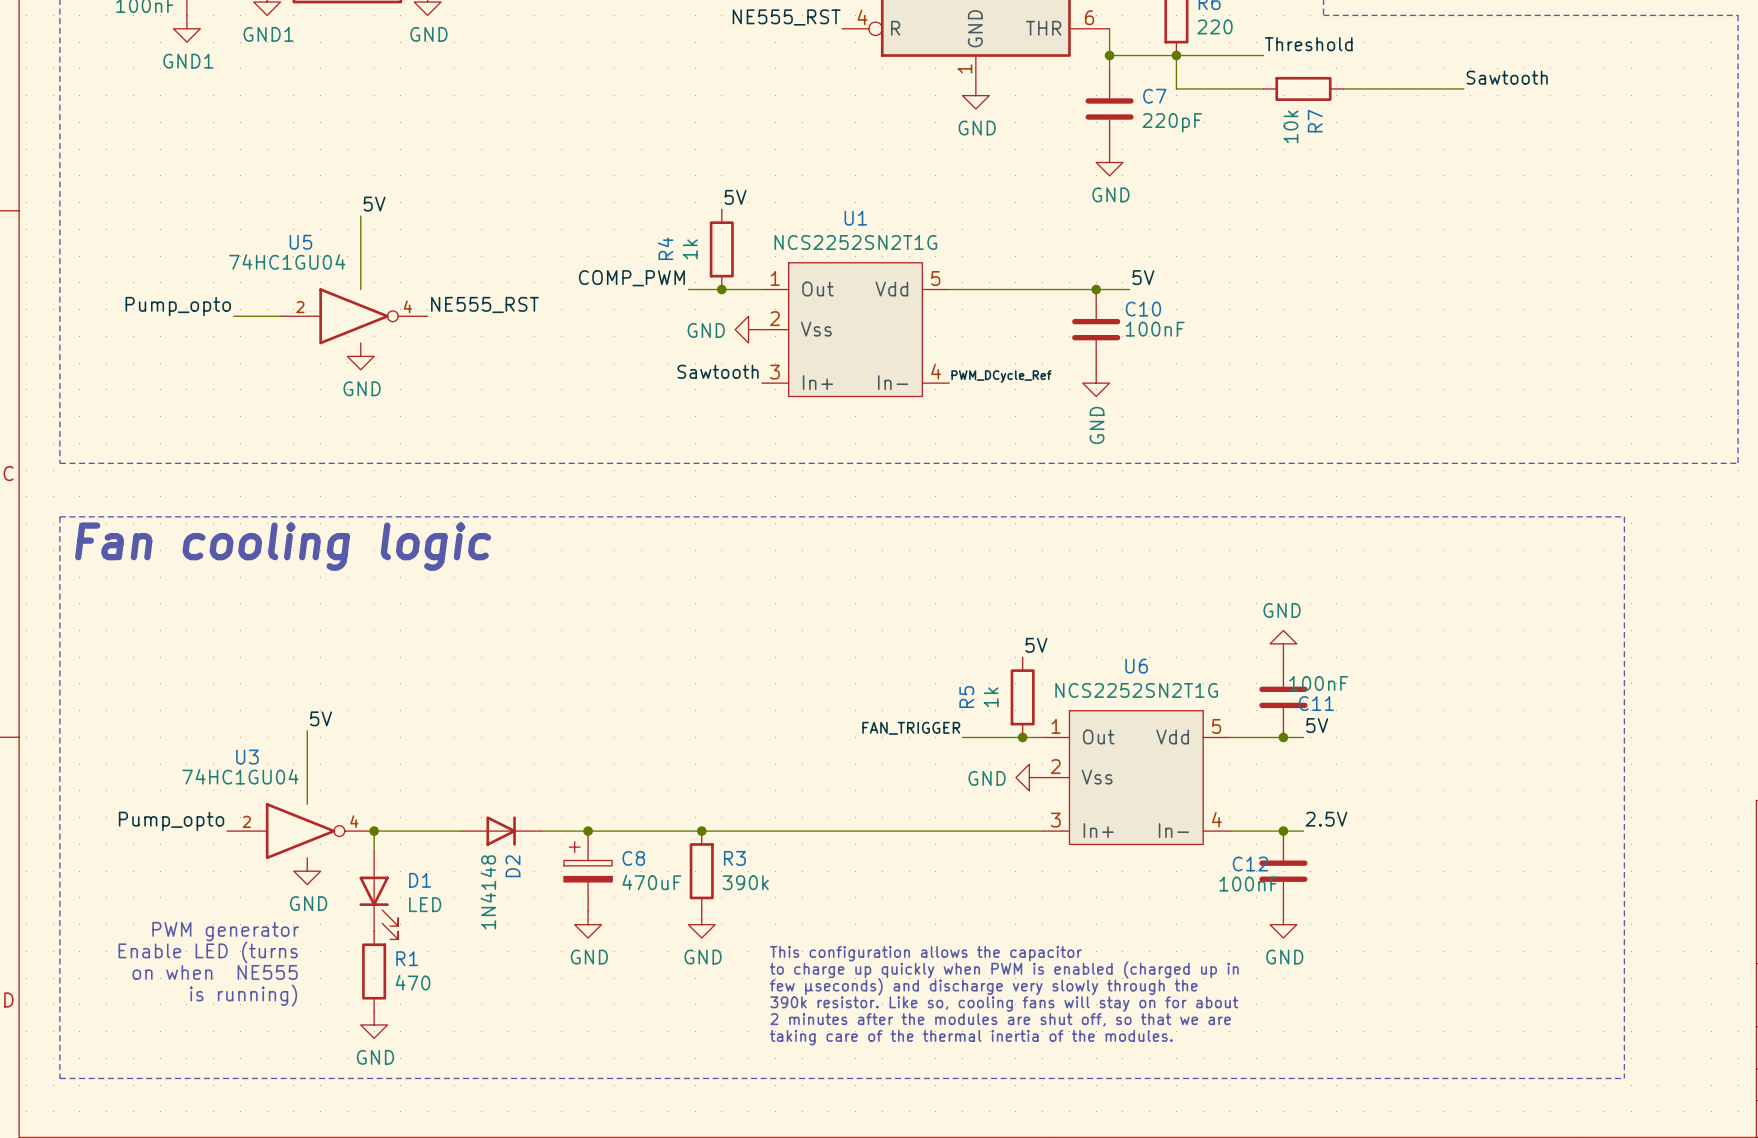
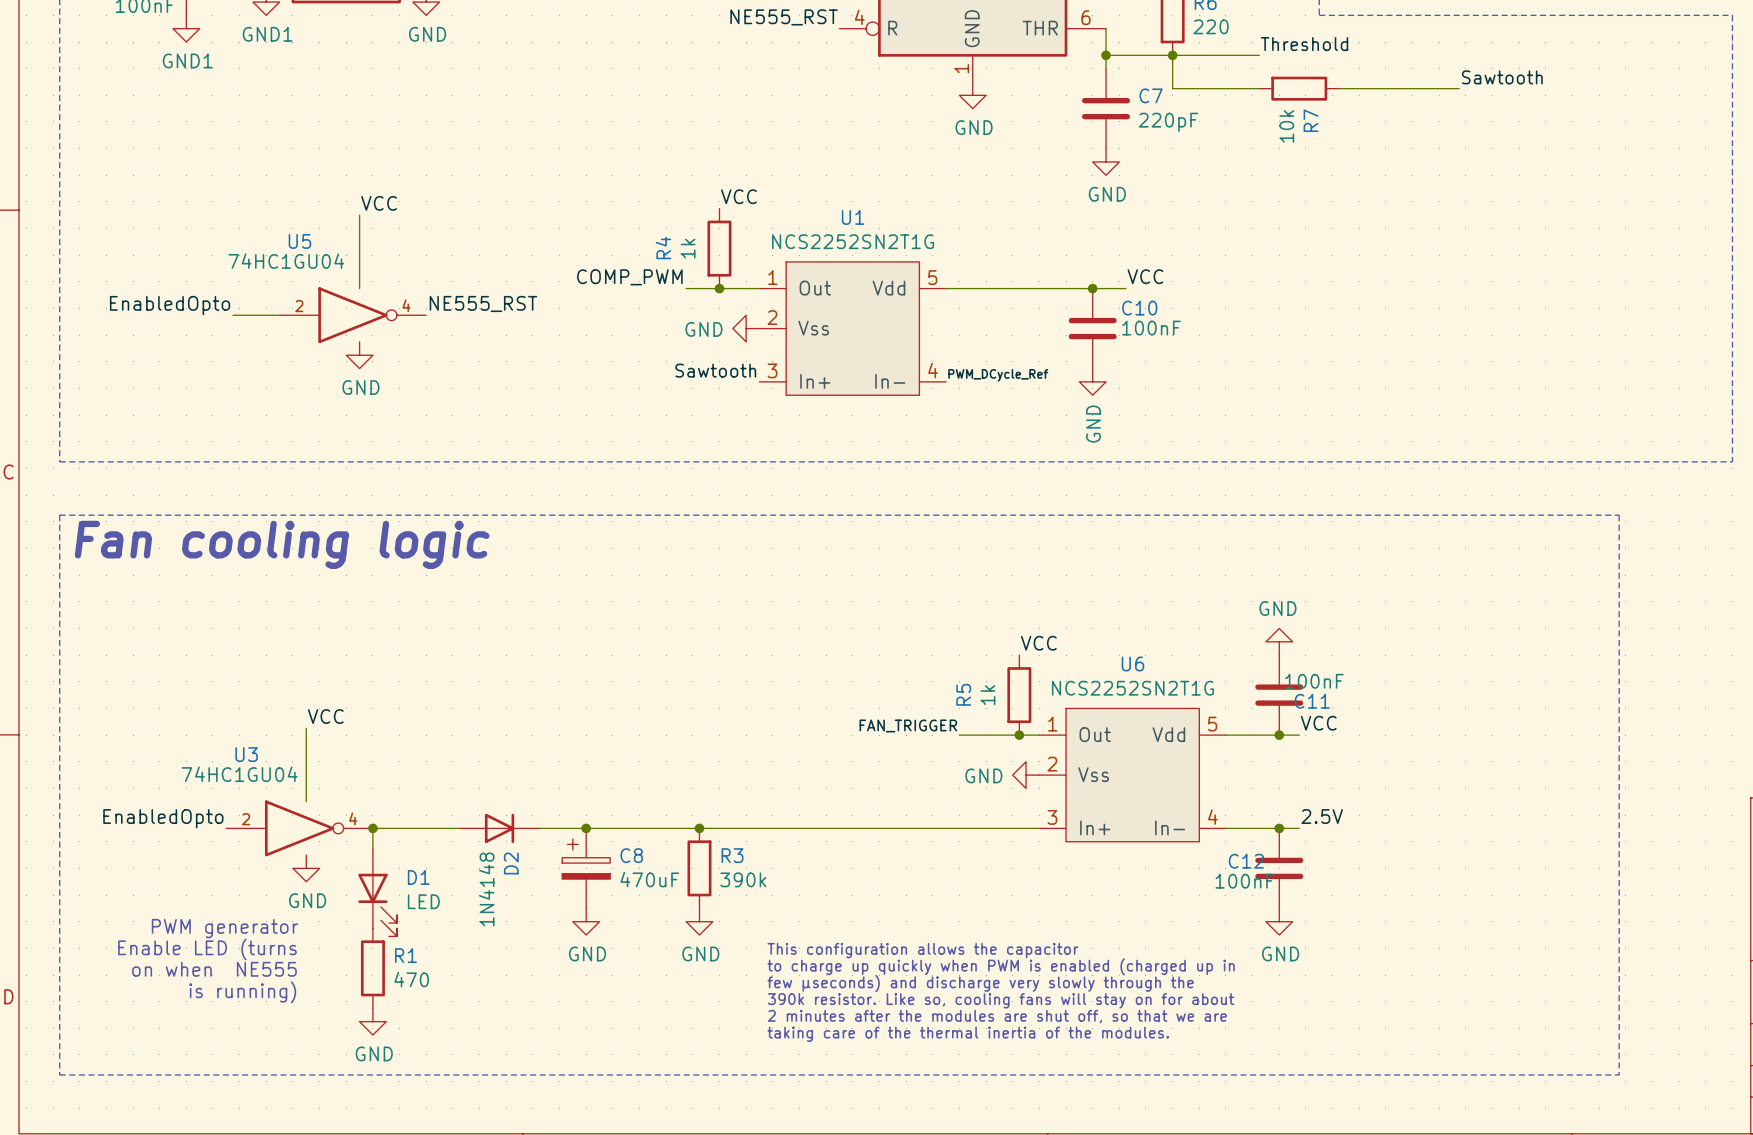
label: 5V (735, 197) -> VCC (738, 196)
label: 5V (374, 204) -> VCC (379, 203)
label: 5V (1143, 277) -> VCC (1145, 276)
label: Pump_opto (178, 306) -> EnabledOpto (170, 305)
label: 5V (1036, 645) -> VCC (1038, 643)
label: 5V (321, 718) -> VCC (325, 716)
label: 5V (1317, 725) -> VCC (1318, 723)
label: Pump_opto (171, 821) -> EnabledOpto (163, 818)

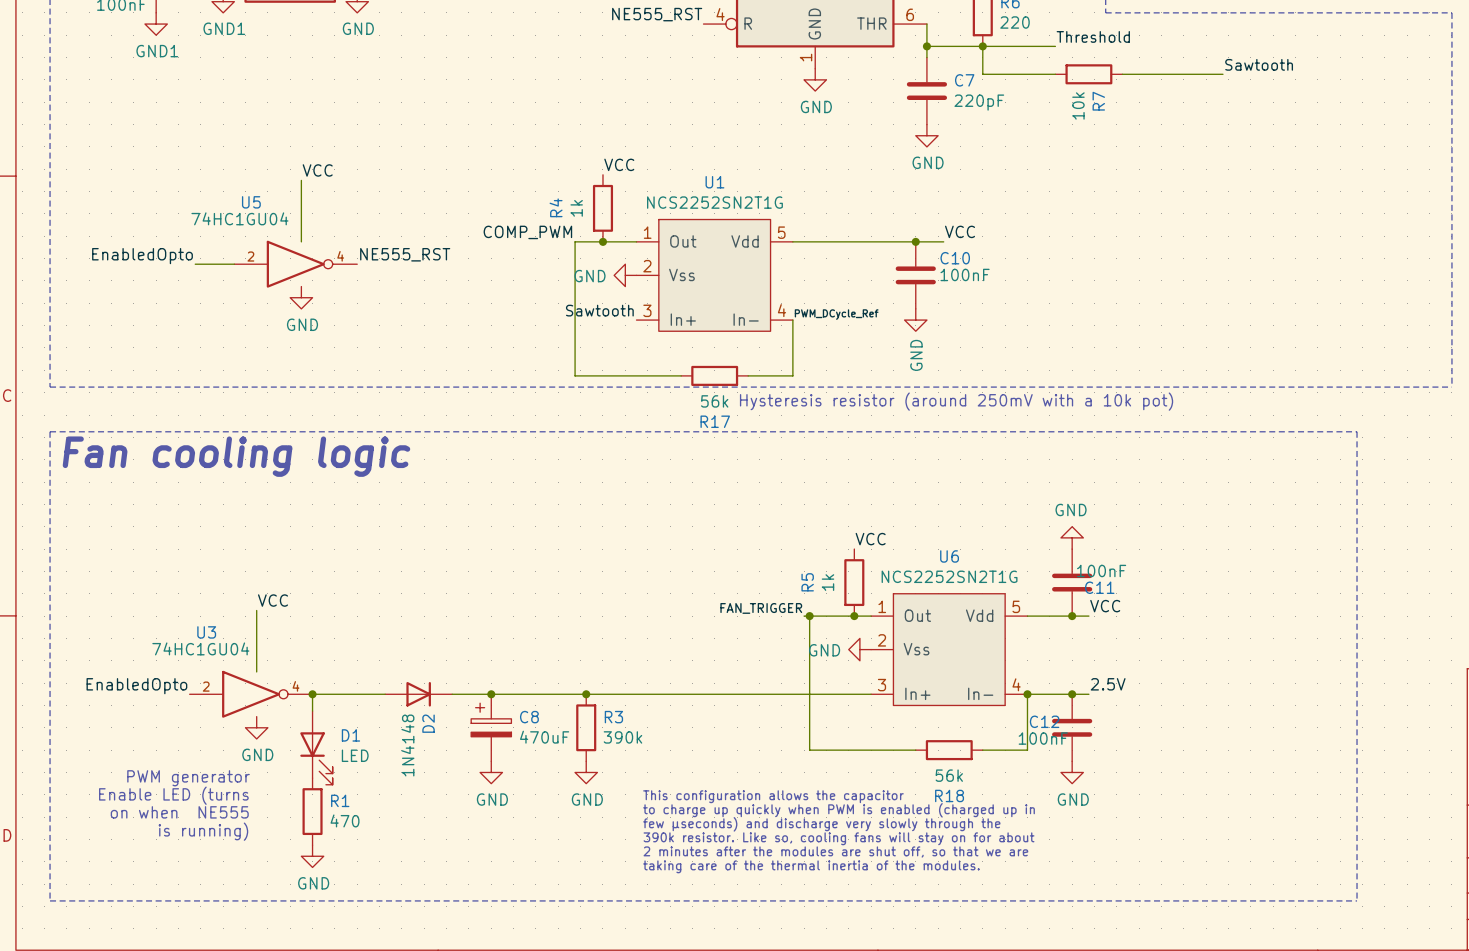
wire: none -> (575, 241) (575, 375) (681, 375)
wire: none -> (792, 320) (792, 375) (748, 375)
R17: none -> 56k (714, 375)
text: none -> Hysteresis resistor (around 250mV with a 10k pot) (956, 401)
wire: none -> (809, 616) (809, 750) (915, 750)
junction: none -> (809, 616)
wire: none -> (1027, 694) (1027, 750) (982, 750)
junction: none -> (1027, 694)
R18: none -> 56k (949, 750)

